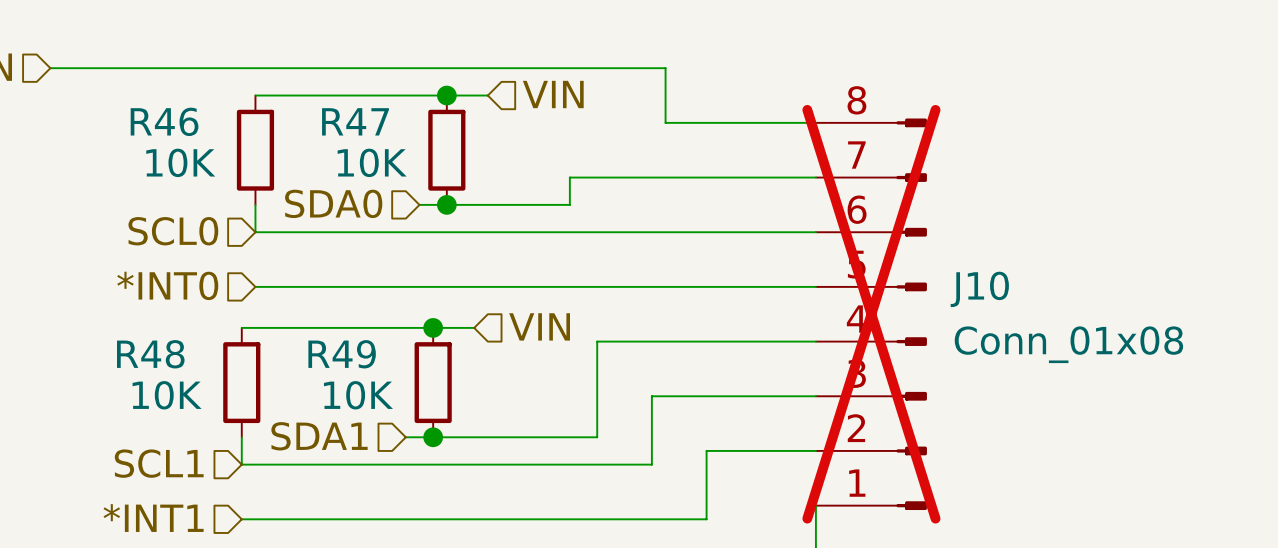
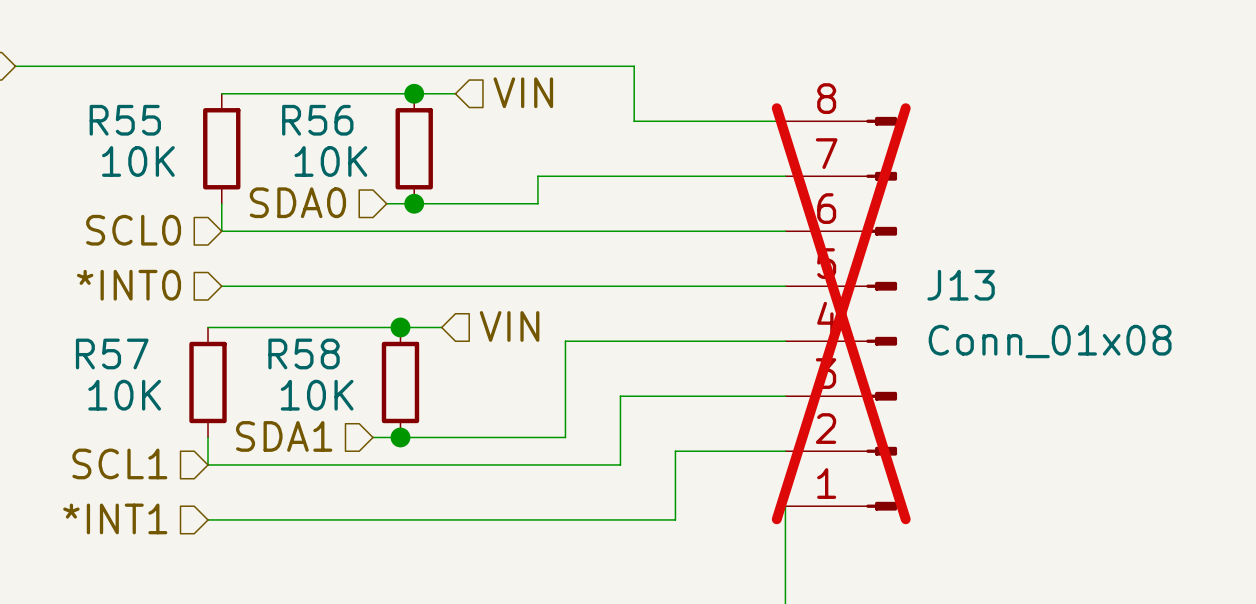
R46 name: R46 (164, 121) -> R55 (125, 120)
R47 name: R47 (355, 121) -> R56 (317, 120)
J10 name: J10 (979, 289) -> J13 (961, 285)
R48 name: R48 (150, 354) -> R57 (112, 353)
R49 name: R49 (342, 354) -> R58 (304, 353)

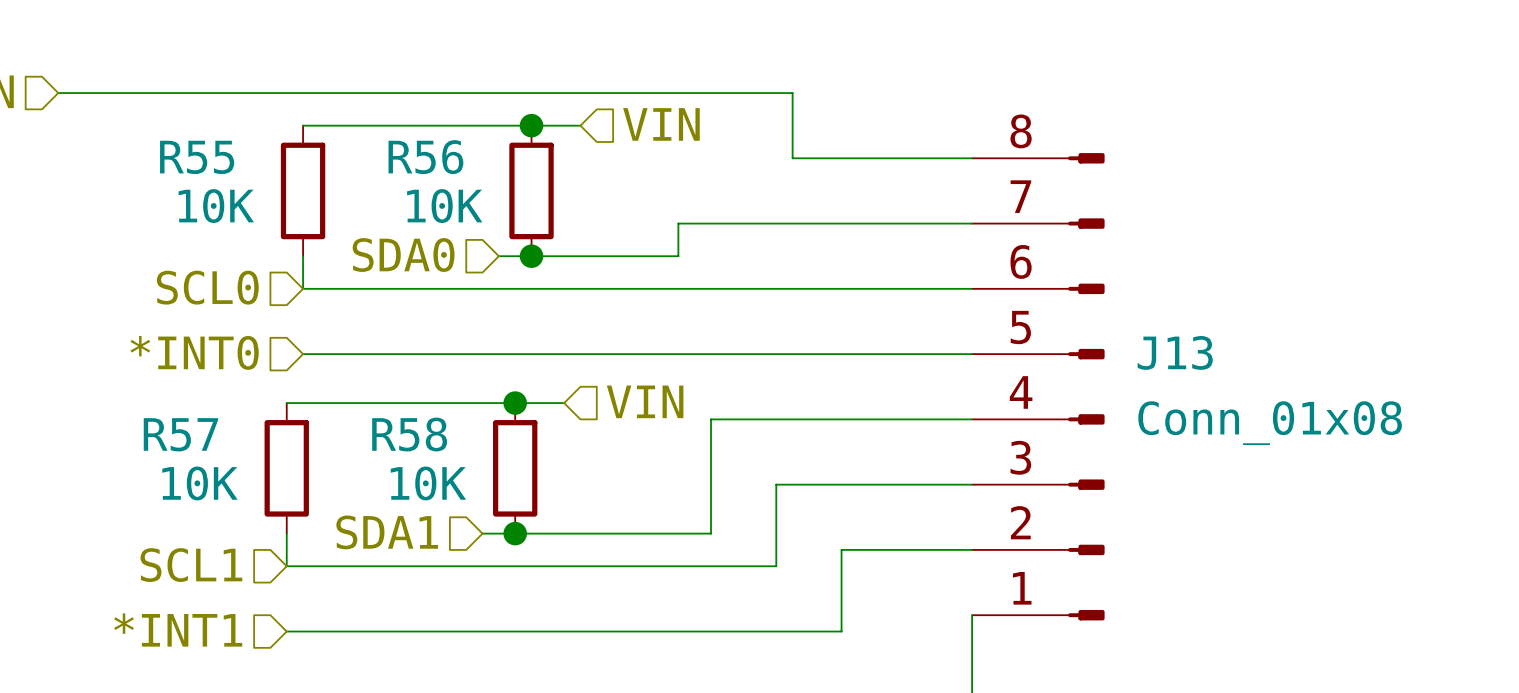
J13 do-not-place cross: (841, 313) -> none

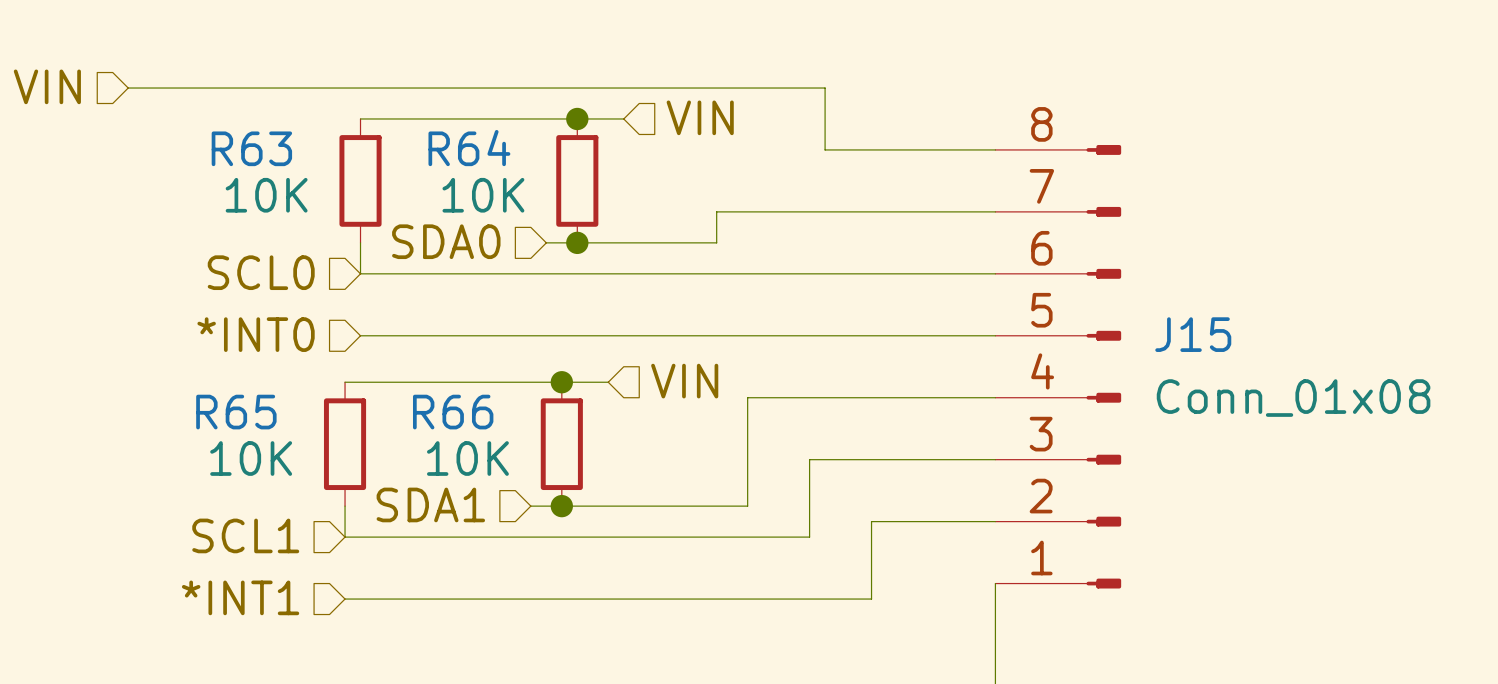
R55 name: R55 (197, 157) -> R63 (251, 148)
R56 name: R56 (425, 157) -> R64 (469, 148)
J13 name: J13 (1175, 352) -> J15 (1193, 334)
R57 name: R57 (180, 434) -> R65 (236, 412)
R58 name: R58 (409, 434) -> R66 (453, 412)

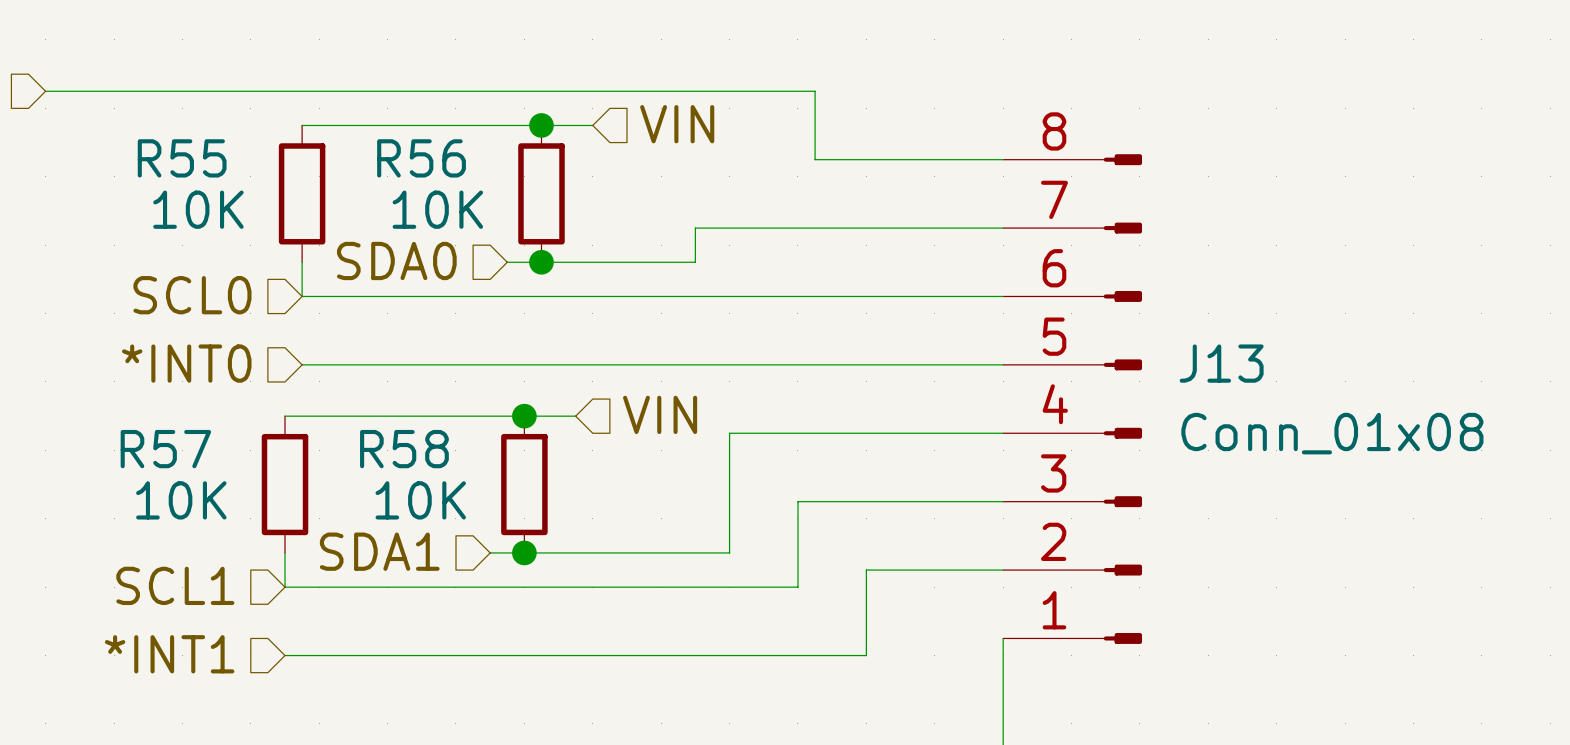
R63 name: R63 (251, 148) -> R55 (182, 158)
R64 name: R64 (469, 148) -> R56 (421, 158)
J15 name: J15 (1193, 334) -> J13 (1221, 363)
R65 name: R65 (236, 412) -> R57 (165, 449)
R66 name: R66 (453, 412) -> R58 (404, 449)

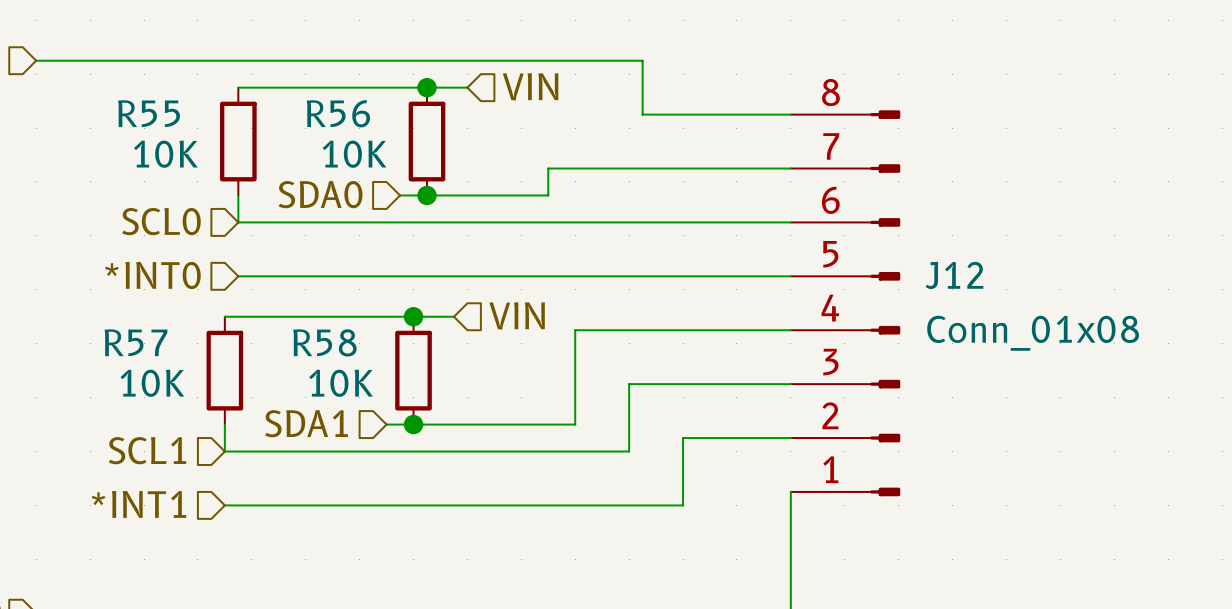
J13 name: J13 (1221, 363) -> J12 (954, 275)

